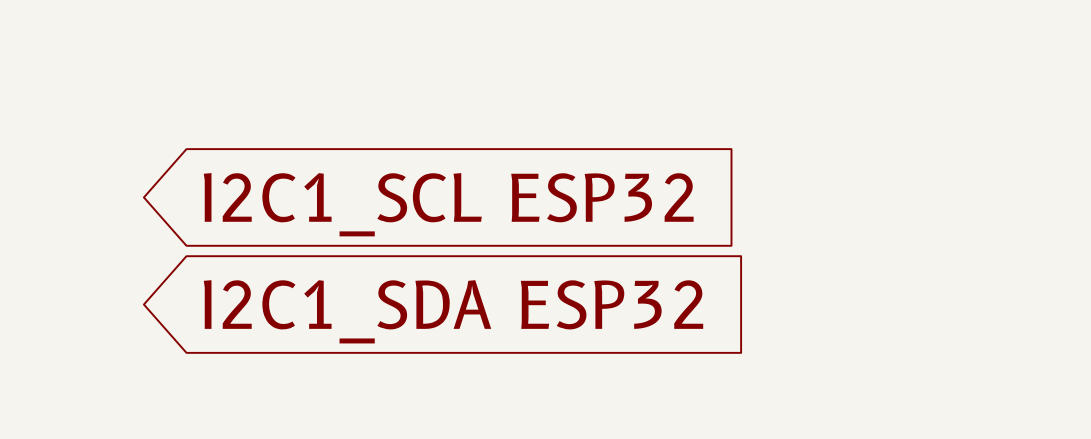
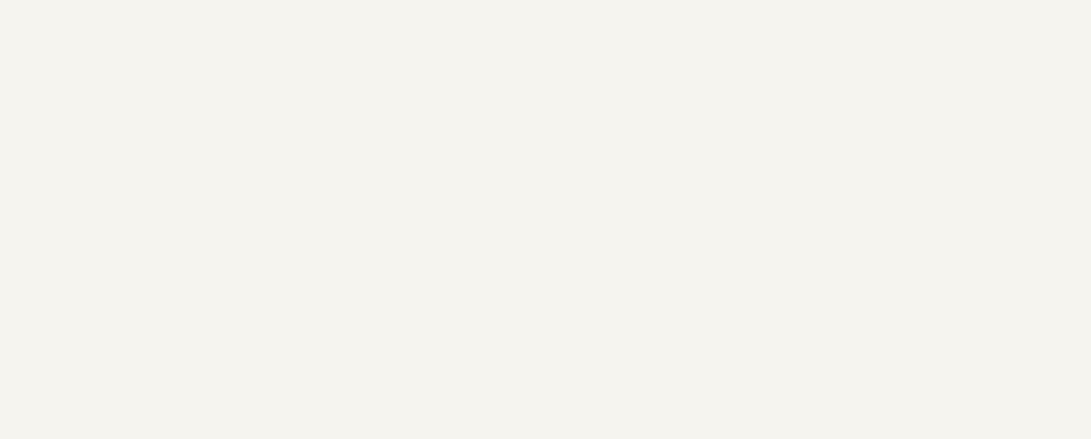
global label: I2C1_SCL ESP32 (448, 204) -> none
global label: I2C1_SDA ESP32 (453, 311) -> none

